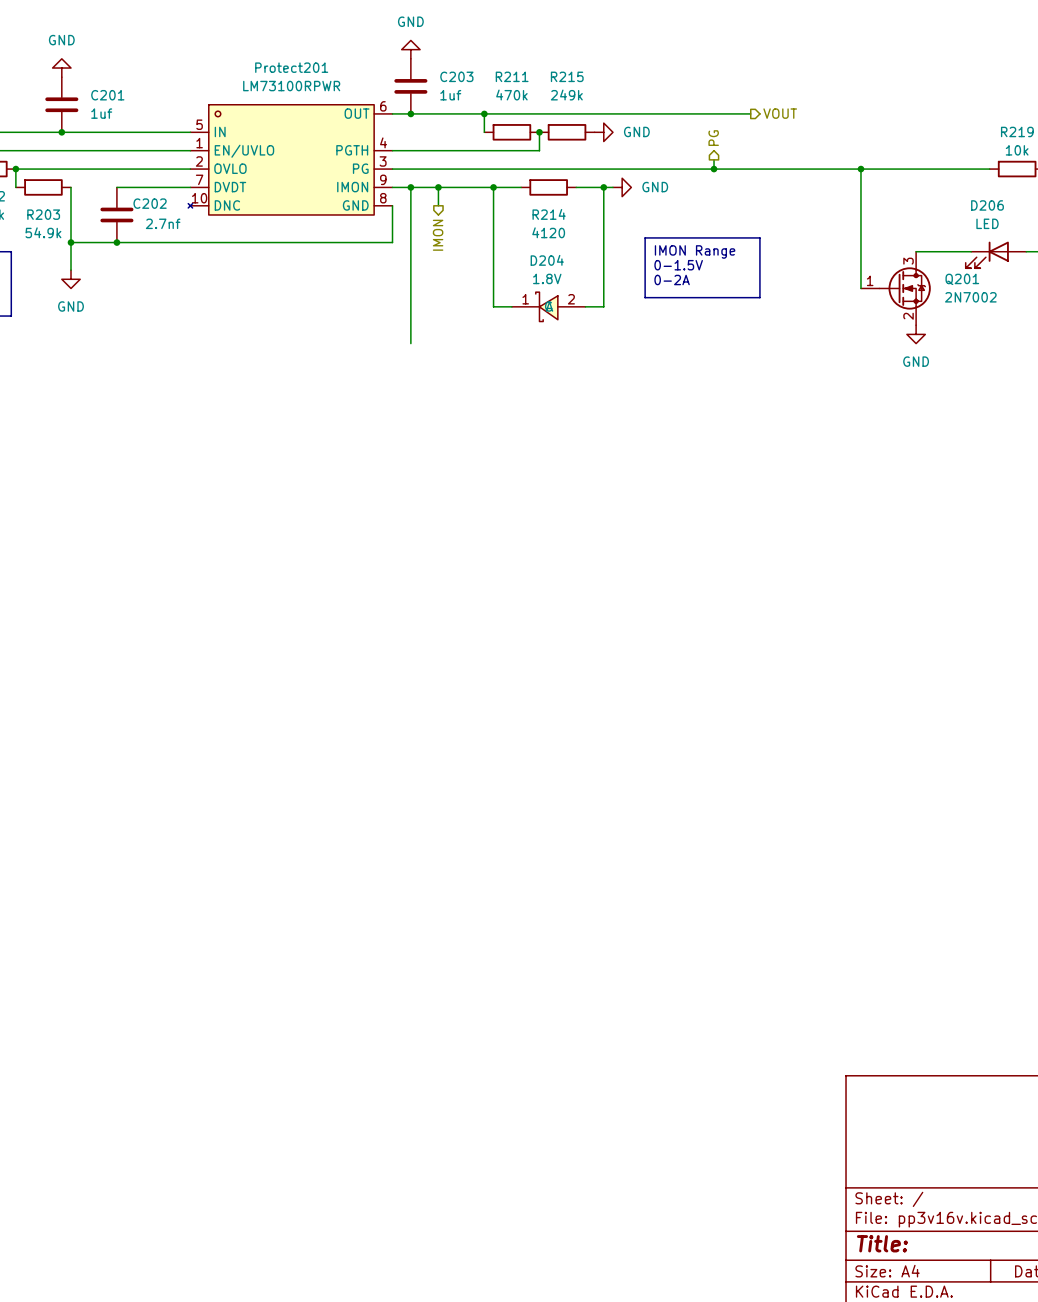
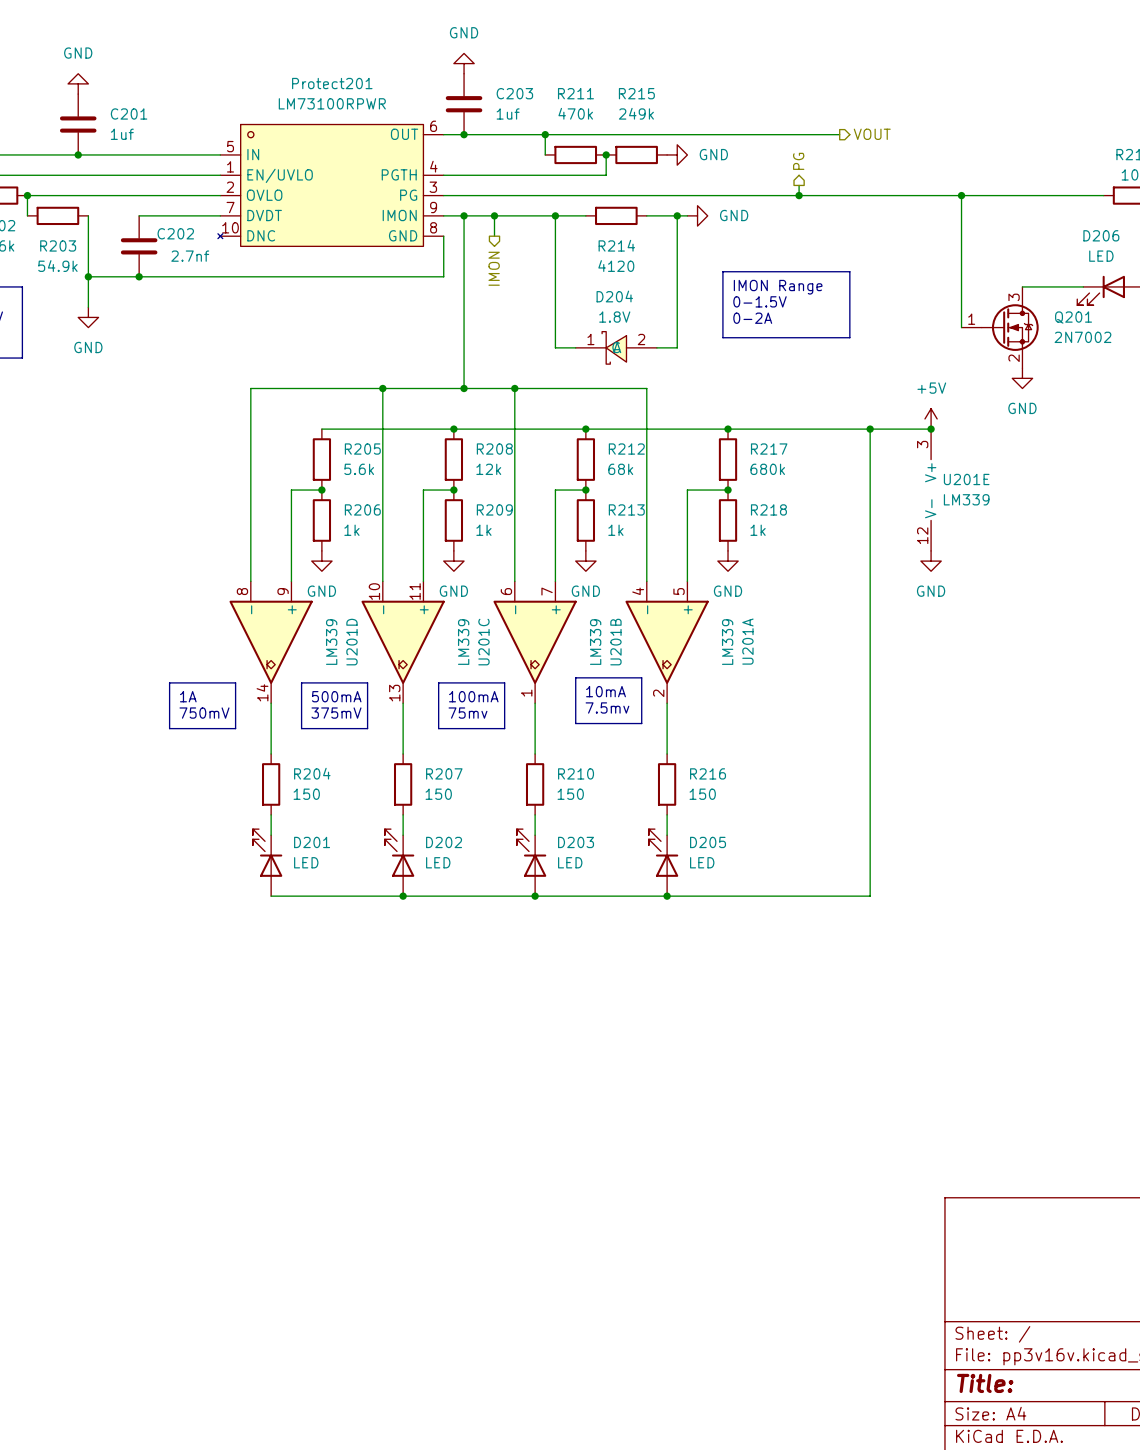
wire: none -> (382, 388) (382, 581)
junction: none -> (382, 388)
junction: none -> (464, 388)
wire: none -> (514, 388) (514, 581)
junction: none -> (514, 388)
power symbol: none -> +5V (931, 418)
wire: none -> (321, 429) (931, 429)
junction: none -> (453, 429)
junction: none -> (585, 429)
junction: none -> (728, 429)
wire: none -> (870, 429) (870, 896) (271, 896)
junction: none -> (870, 429)
junction: none -> (931, 429)
R205: none -> 5.6k (321, 459)
R208: none -> 12k (453, 459)
R212: none -> 68k (585, 459)
R217: none -> 680k (728, 459)
wire: none -> (321, 490) (291, 490) (291, 581)
junction: none -> (321, 490)
wire: none -> (453, 490) (423, 490) (423, 581)
junction: none -> (453, 490)
wire: none -> (585, 490) (555, 490) (555, 581)
junction: none -> (585, 490)
wire: none -> (728, 490) (687, 490) (687, 581)
junction: none -> (728, 490)
U201E: none -> LM339 (931, 490)
R206: none -> 1k (321, 520)
R209: none -> 1k (453, 520)
R213: none -> 1k (585, 520)
R218: none -> 1k (728, 520)
power symbol: none -> GND (321, 561)
power symbol: none -> GND (453, 561)
power symbol: none -> GND (585, 561)
power symbol: none -> GND (728, 561)
power symbol: none -> GND (931, 561)
wire: none -> (250, 581) (250, 388) (646, 388) (646, 581)
U201D: none -> LM339 (271, 642)
U201C: none -> LM339 (403, 642)
U201B: none -> LM339 (535, 642)
U201A: none -> LM339 (667, 642)
line: none -> (575, 677) (641, 677) (641, 723) (575, 723) (575, 677)
line: none -> (169, 682) (235, 682) (235, 728) (169, 728) (169, 682)
line: none -> (301, 682) (367, 682) (367, 728) (301, 728) (301, 682)
line: none -> (438, 682) (504, 682) (504, 728) (438, 728) (438, 682)
text: none -> 10mA (606, 691)
text: none -> 1A (188, 696)
text: none -> 500mA (336, 696)
text: none -> 100mA (473, 696)
wire: none -> (271, 703) (271, 754)
wire: none -> (403, 703) (403, 754)
wire: none -> (535, 703) (535, 754)
wire: none -> (667, 703) (667, 754)
text: none -> 7.5mv (607, 707)
text: none -> 750mV (204, 713)
text: none -> 375mV (336, 713)
text: none -> 75mv (467, 713)
R204: none -> 150 (271, 784)
R207: none -> 150 (403, 784)
R210: none -> 150 (535, 784)
R216: none -> 150 (667, 784)
wire: none -> (271, 814) (271, 835)
wire: none -> (403, 814) (403, 835)
wire: none -> (535, 814) (535, 835)
wire: none -> (667, 814) (667, 835)
D201: none -> LED (267, 862)
D202: none -> LED (399, 862)
D203: none -> LED (531, 862)
D205: none -> LED (663, 862)
junction: none -> (403, 896)
junction: none -> (535, 896)
junction: none -> (667, 896)

